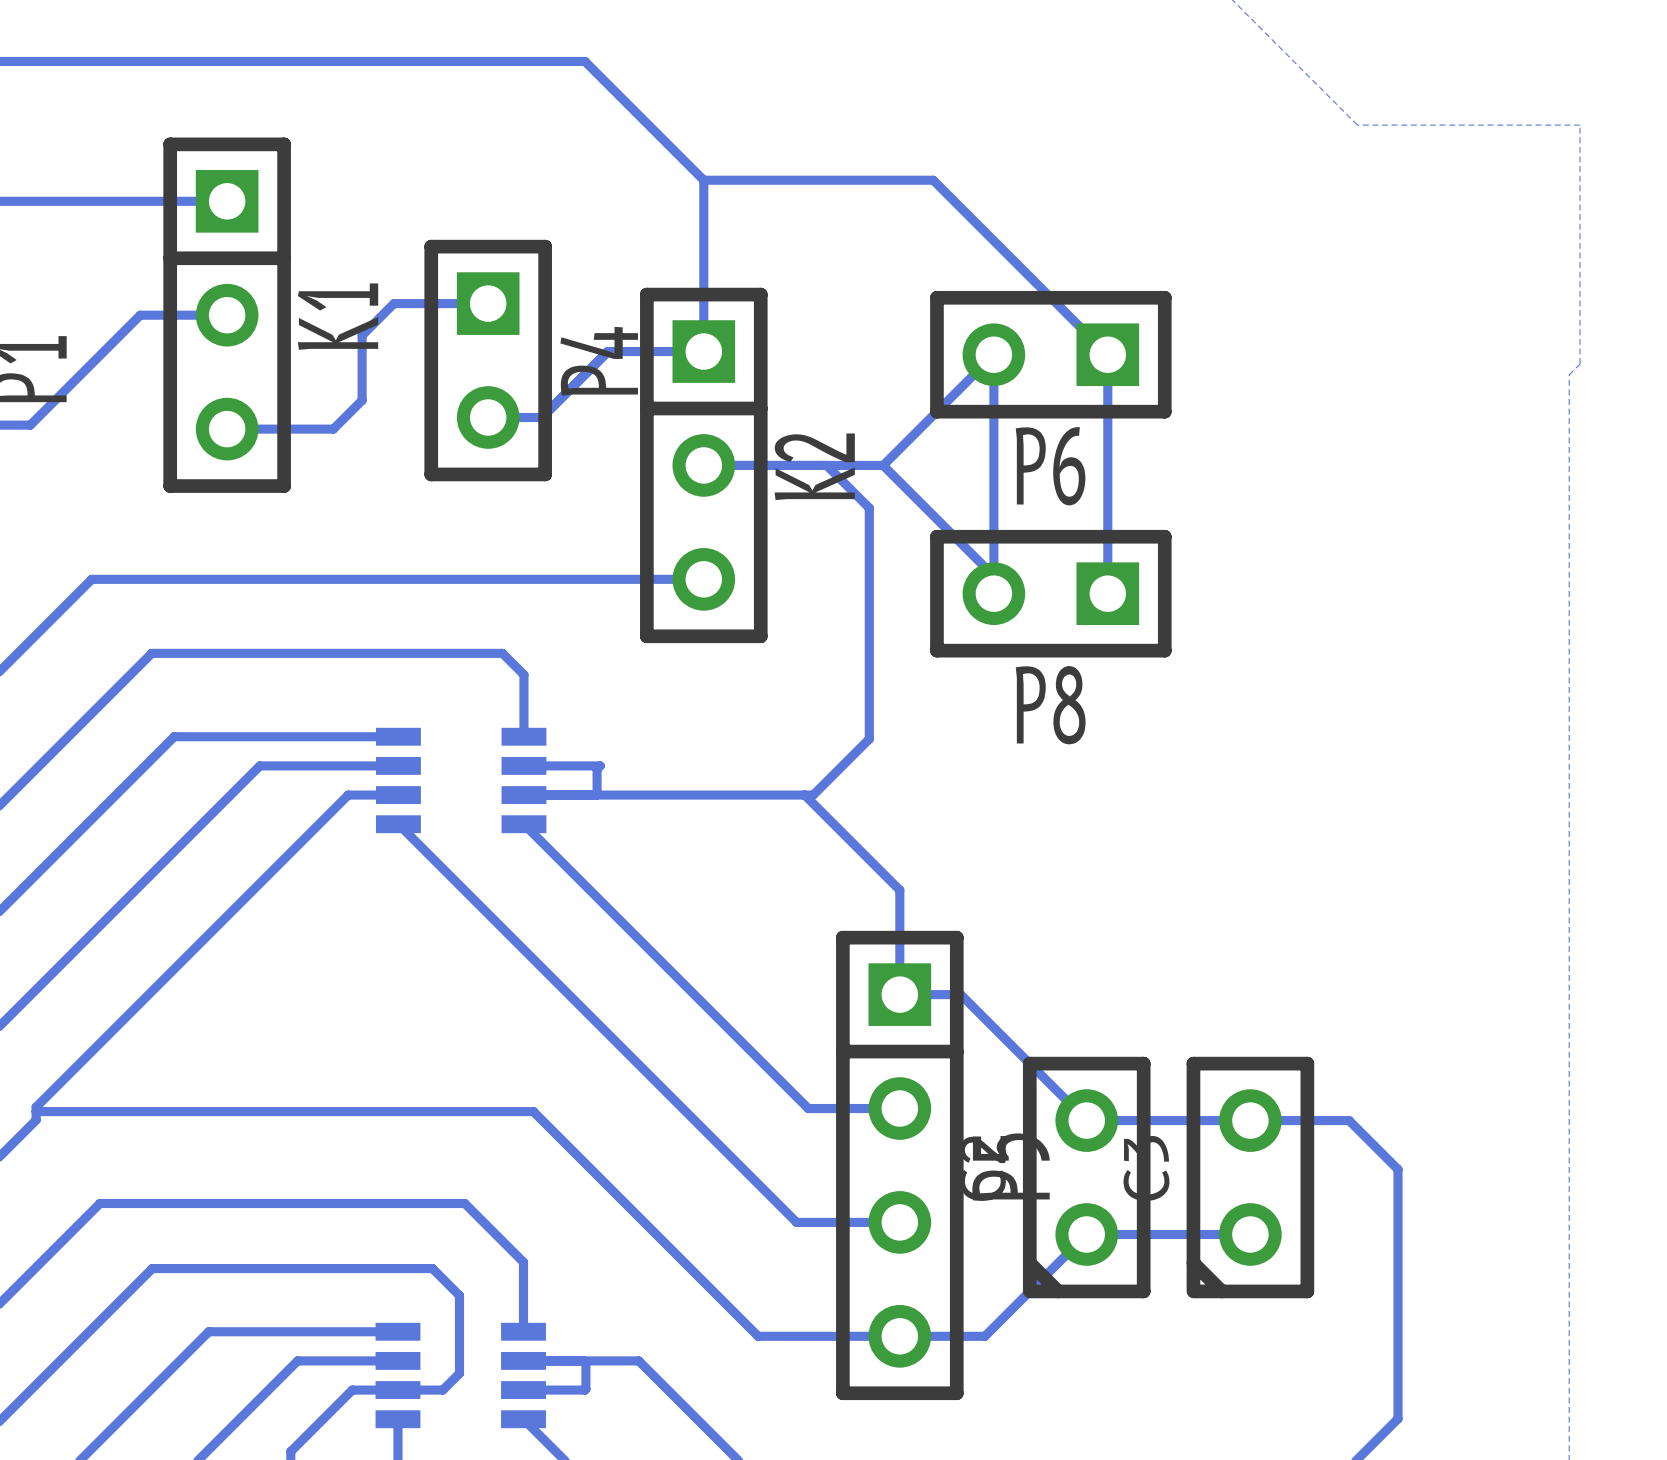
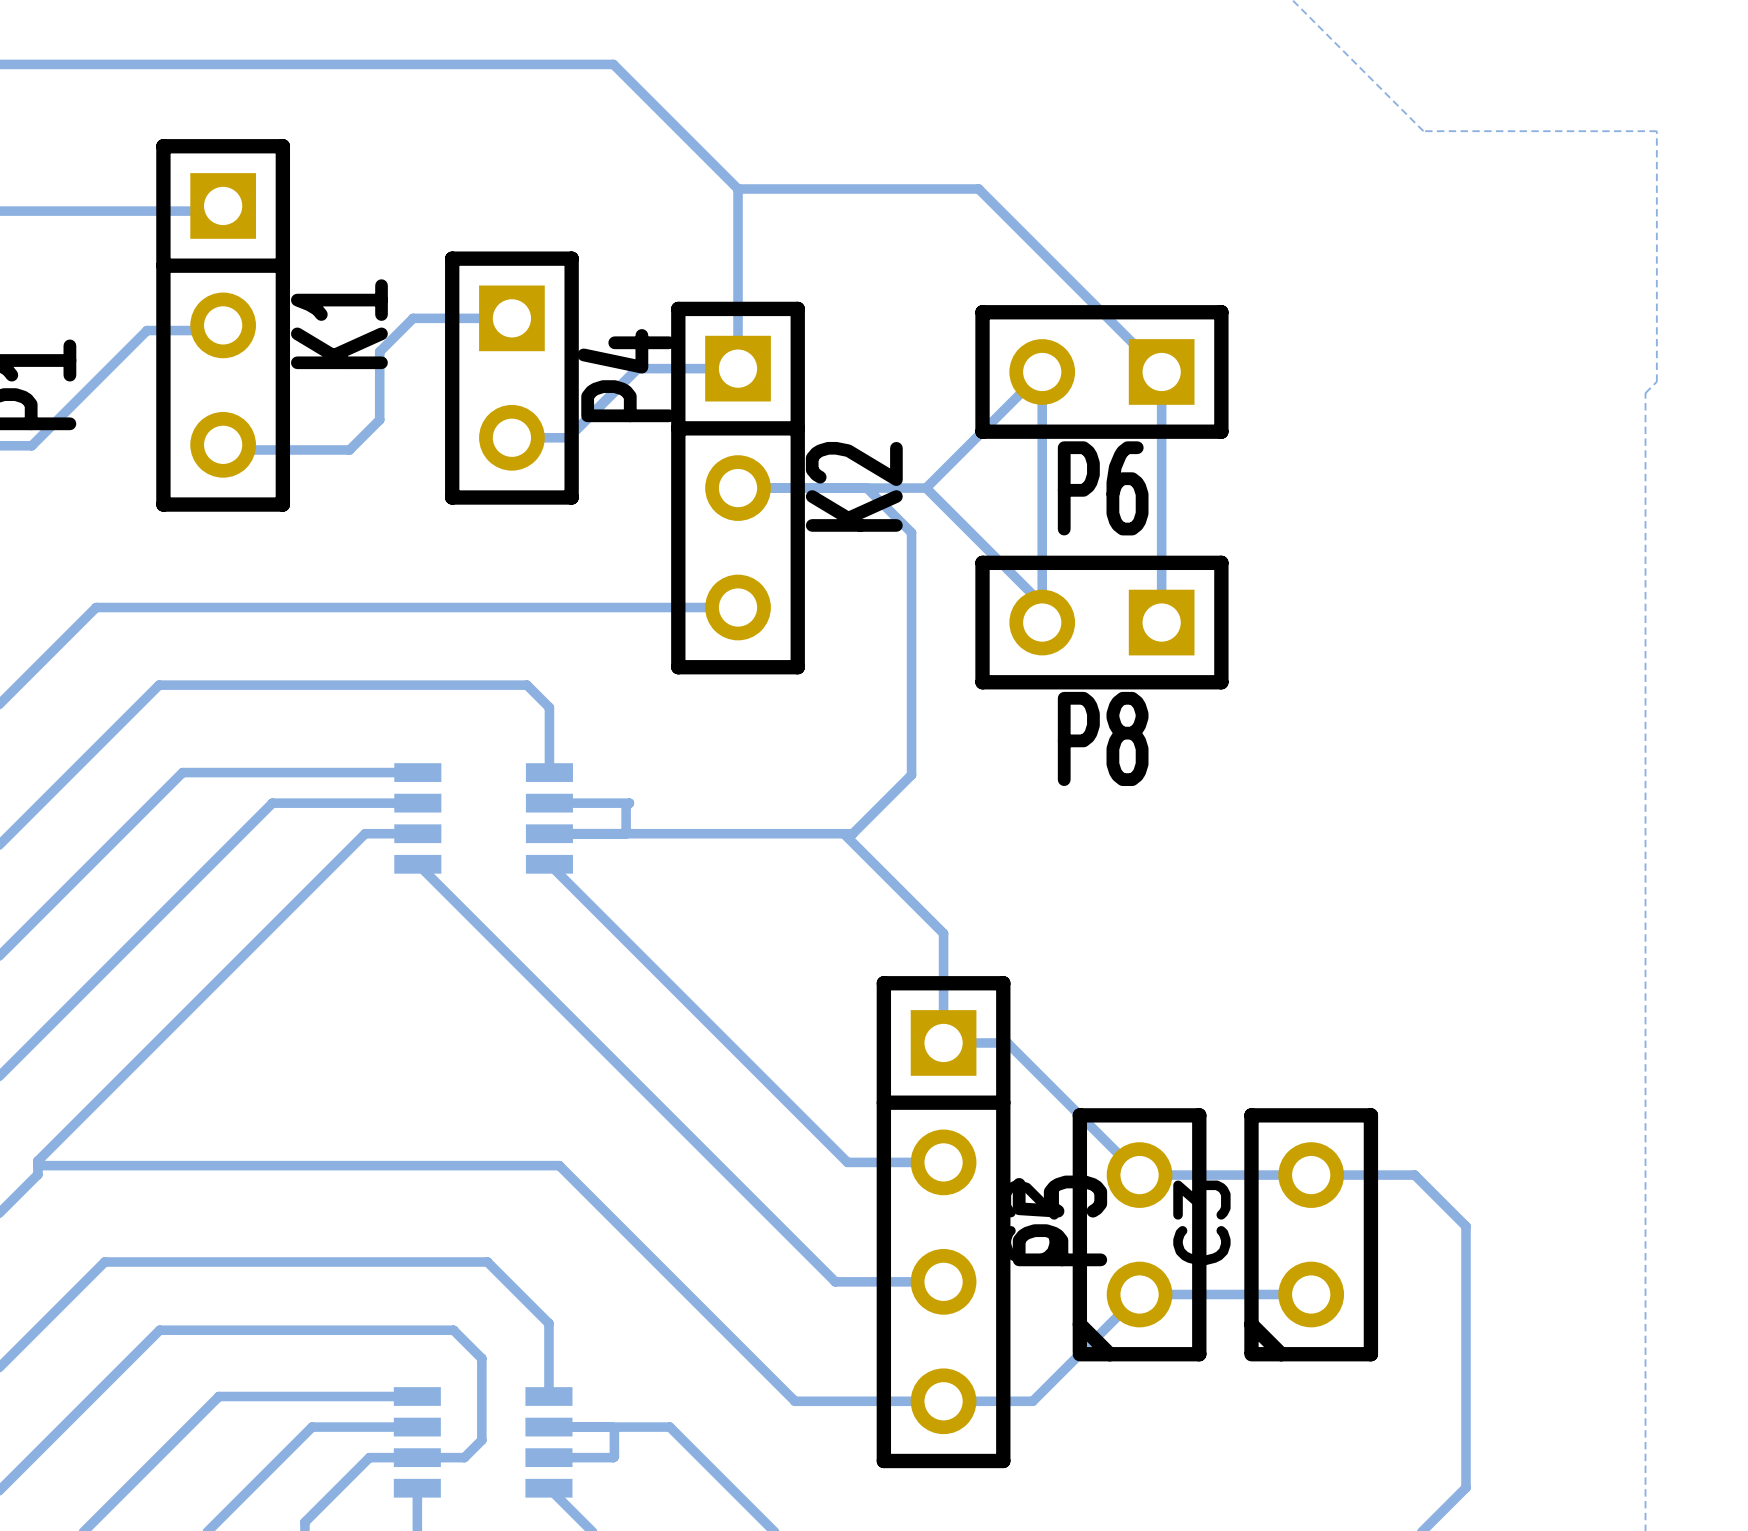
K1 position: (227, 315) -> (223, 325)

